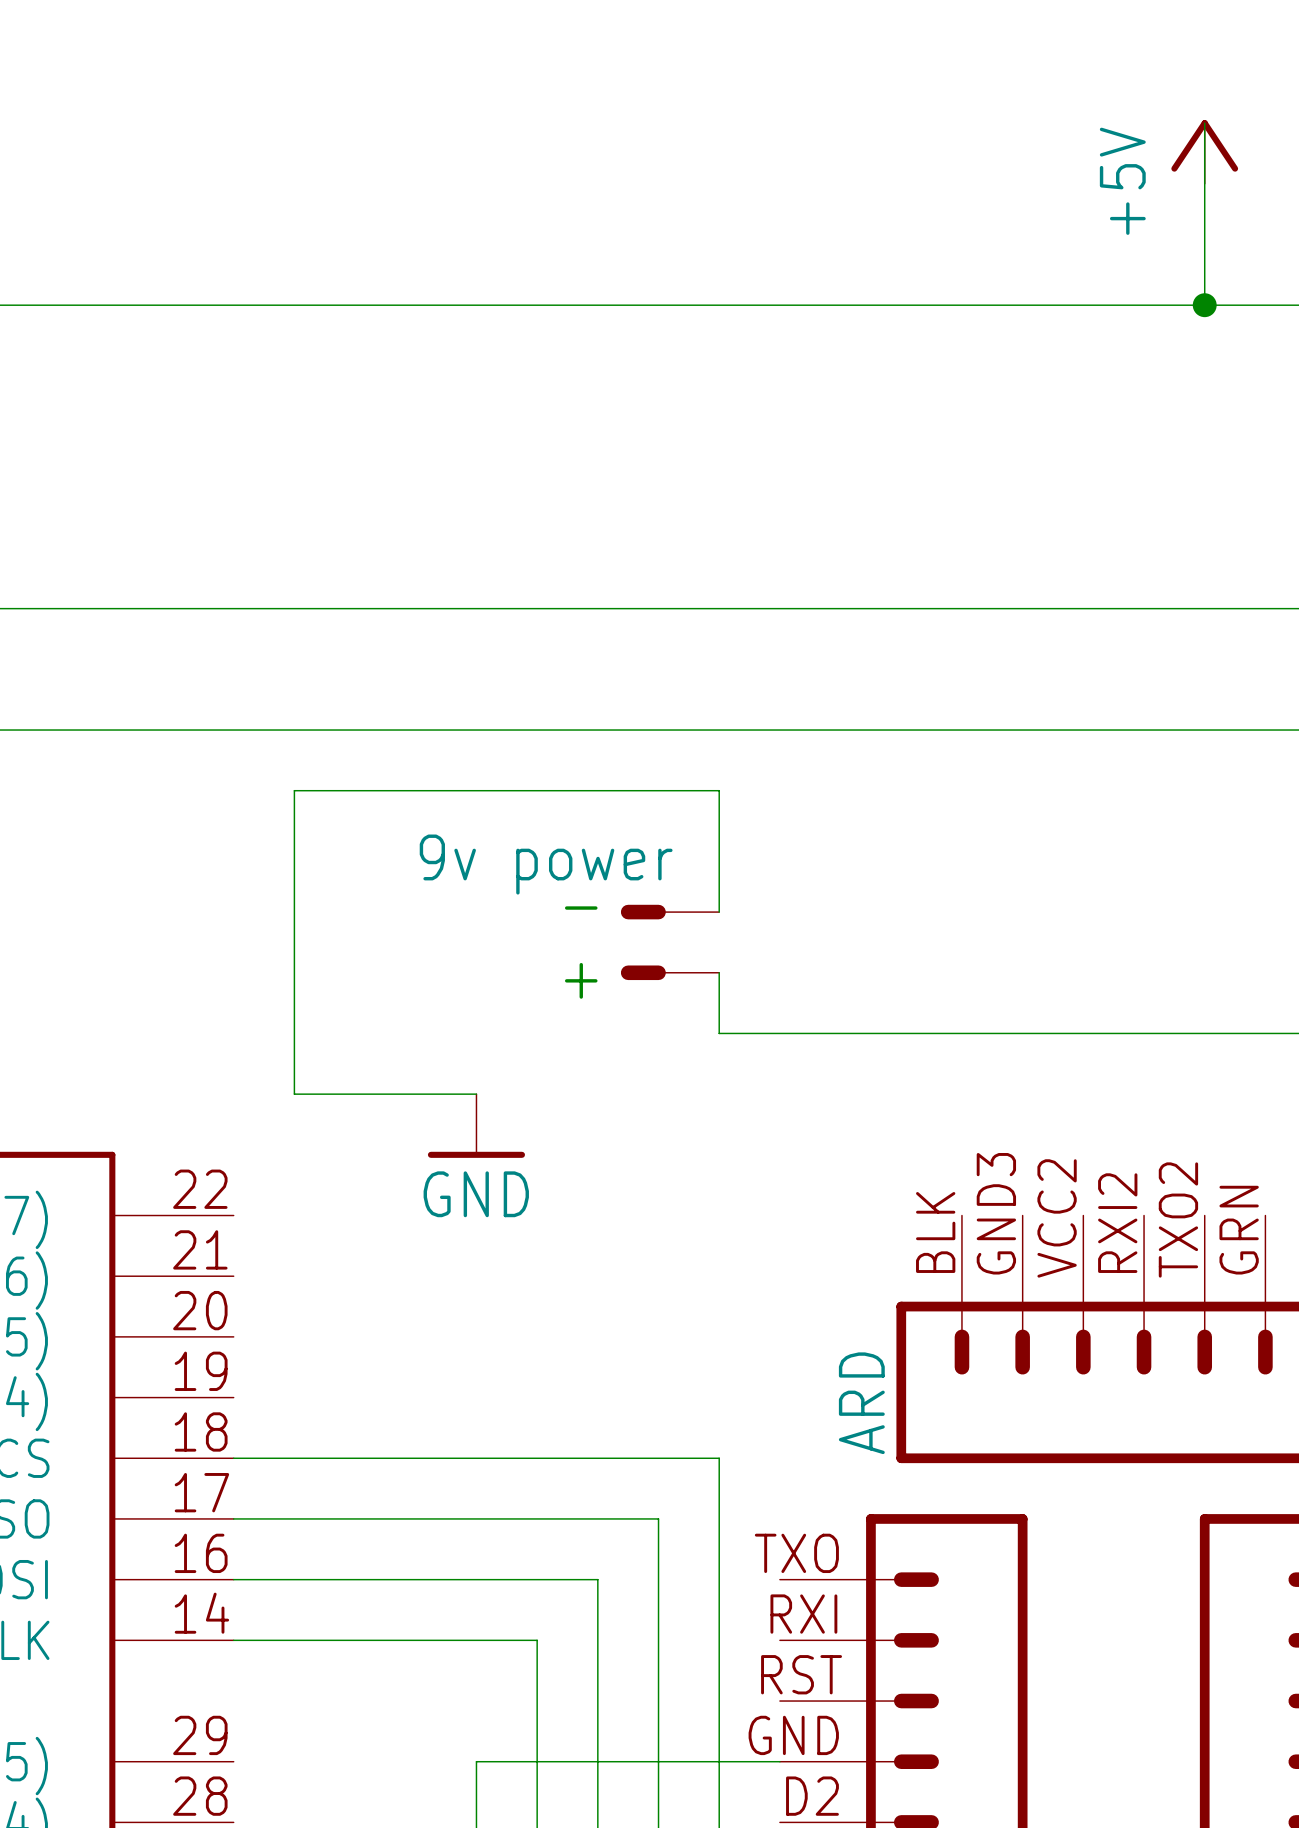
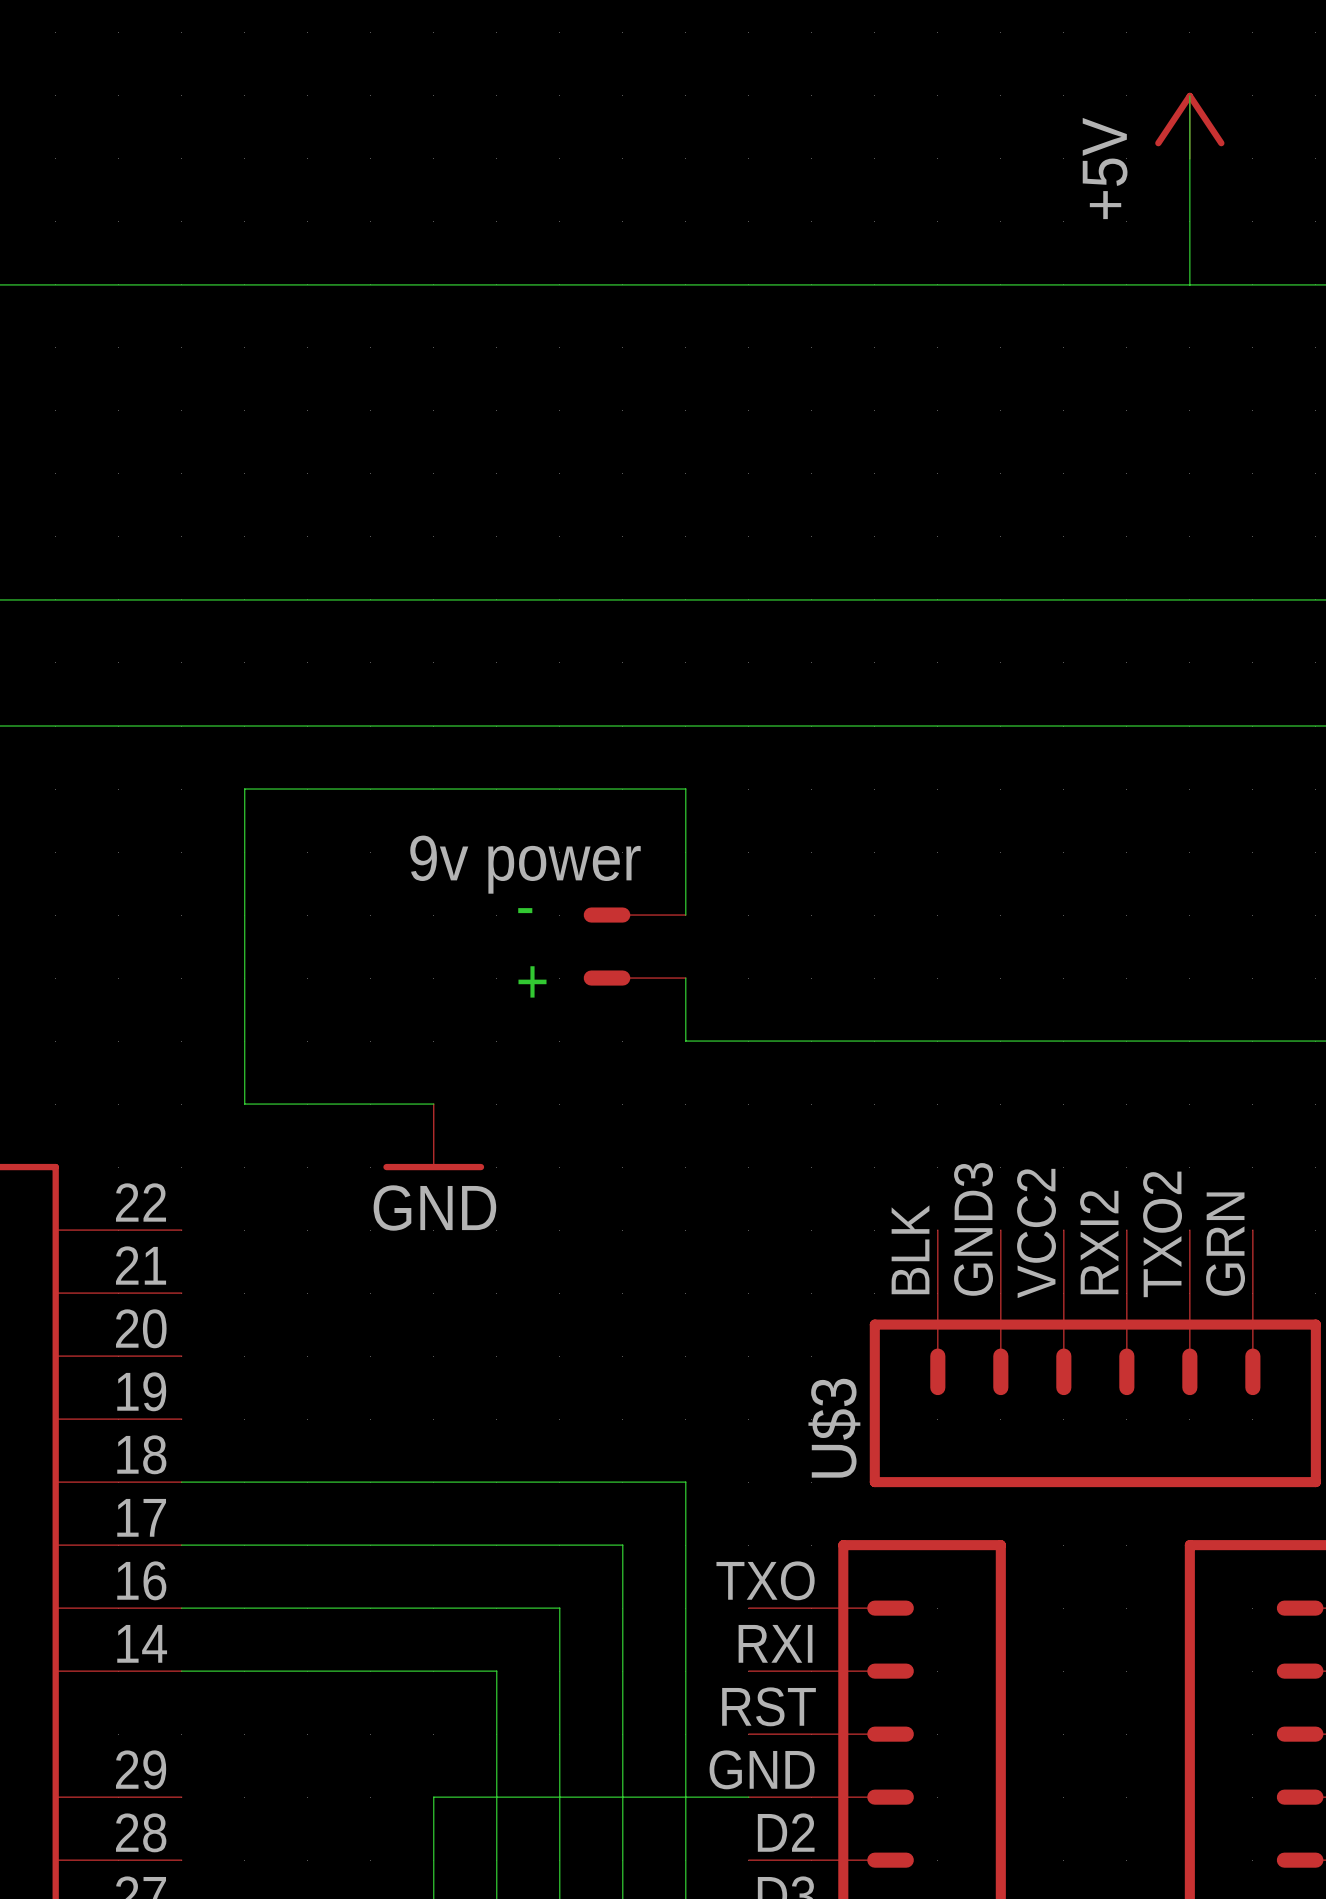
junction: (1204, 305) -> none
ARD name: ARD (861, 1403) -> U$3 (834, 1428)

